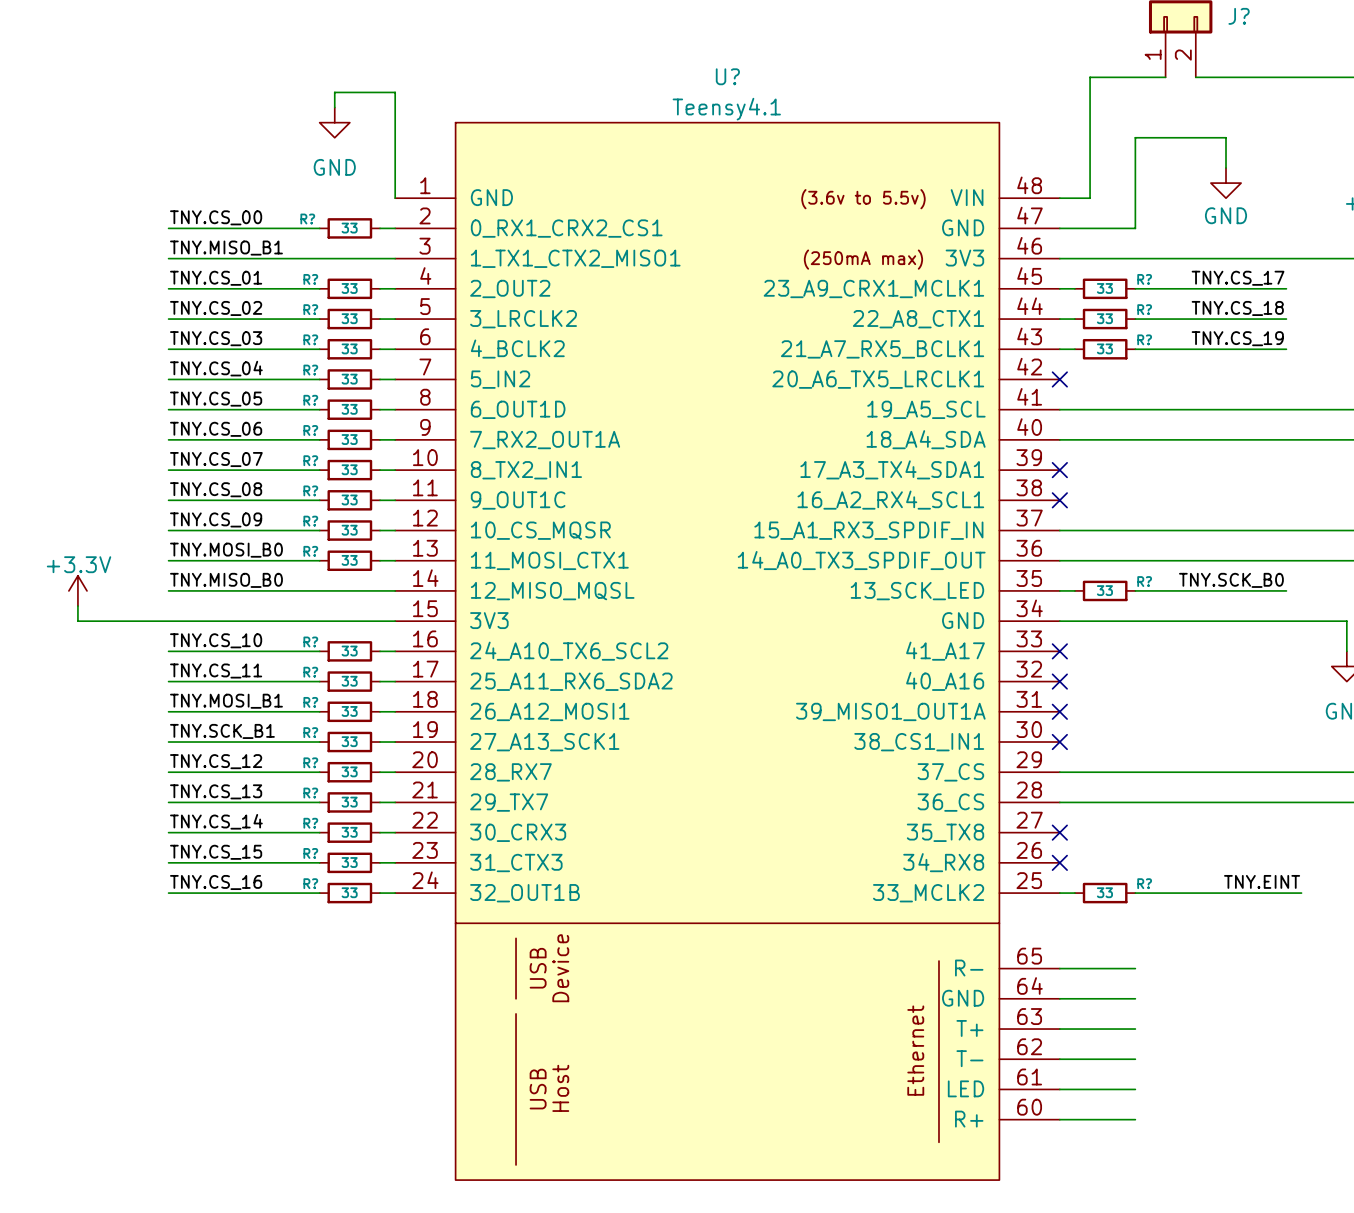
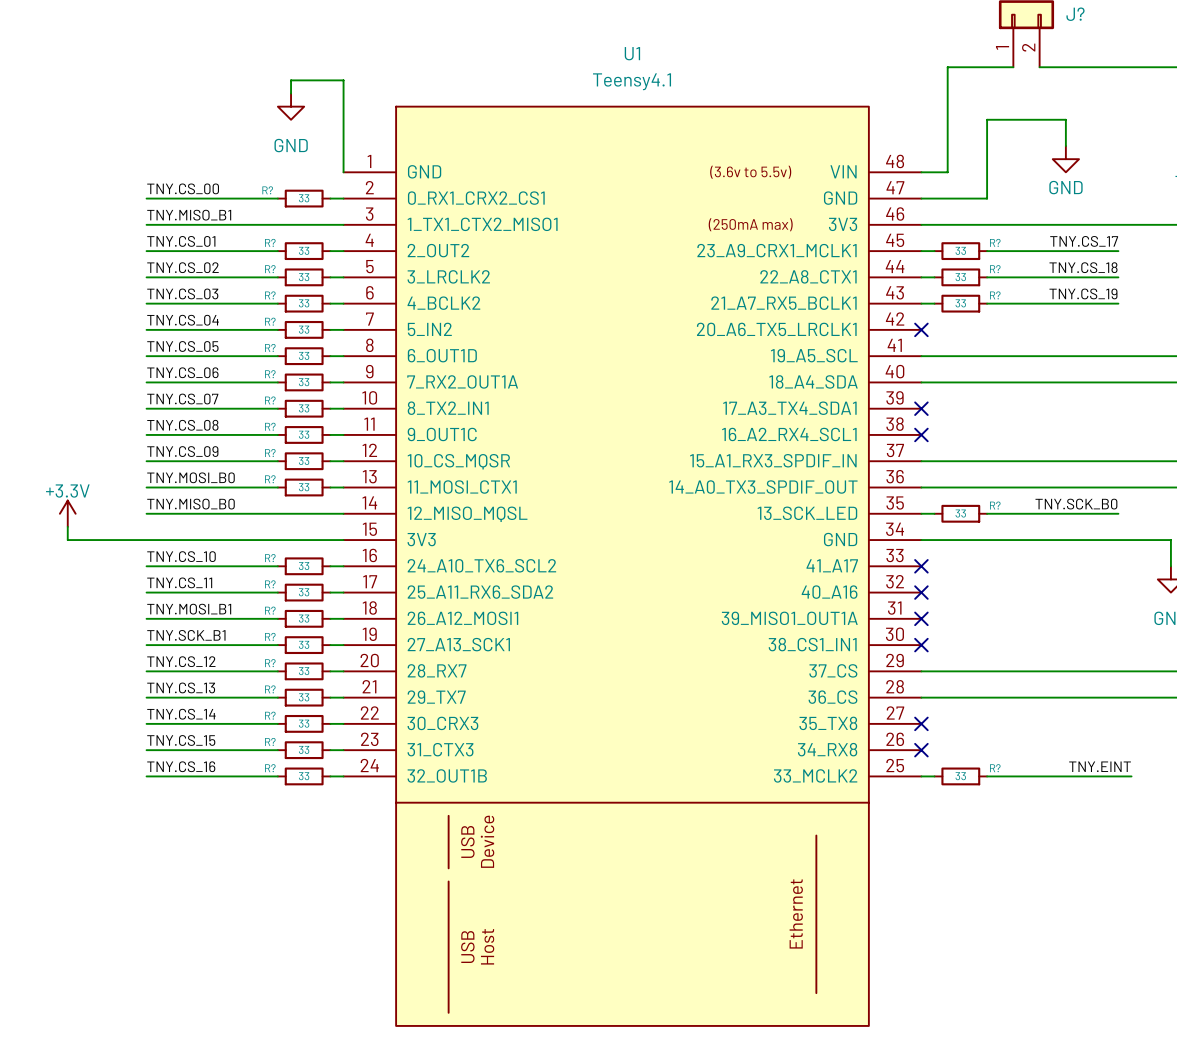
U?: Teensy4.1 (727, 651) -> none
U1: none -> Teensy4.1 (632, 566)
wire: (1059, 968) (1135, 968) -> none
wire: (1059, 998) (1135, 998) -> none
wire: (1059, 1029) (1135, 1029) -> none
wire: (1059, 1059) (1135, 1059) -> none
wire: (1059, 1089) (1135, 1089) -> none
wire: (1059, 1119) (1135, 1119) -> none

